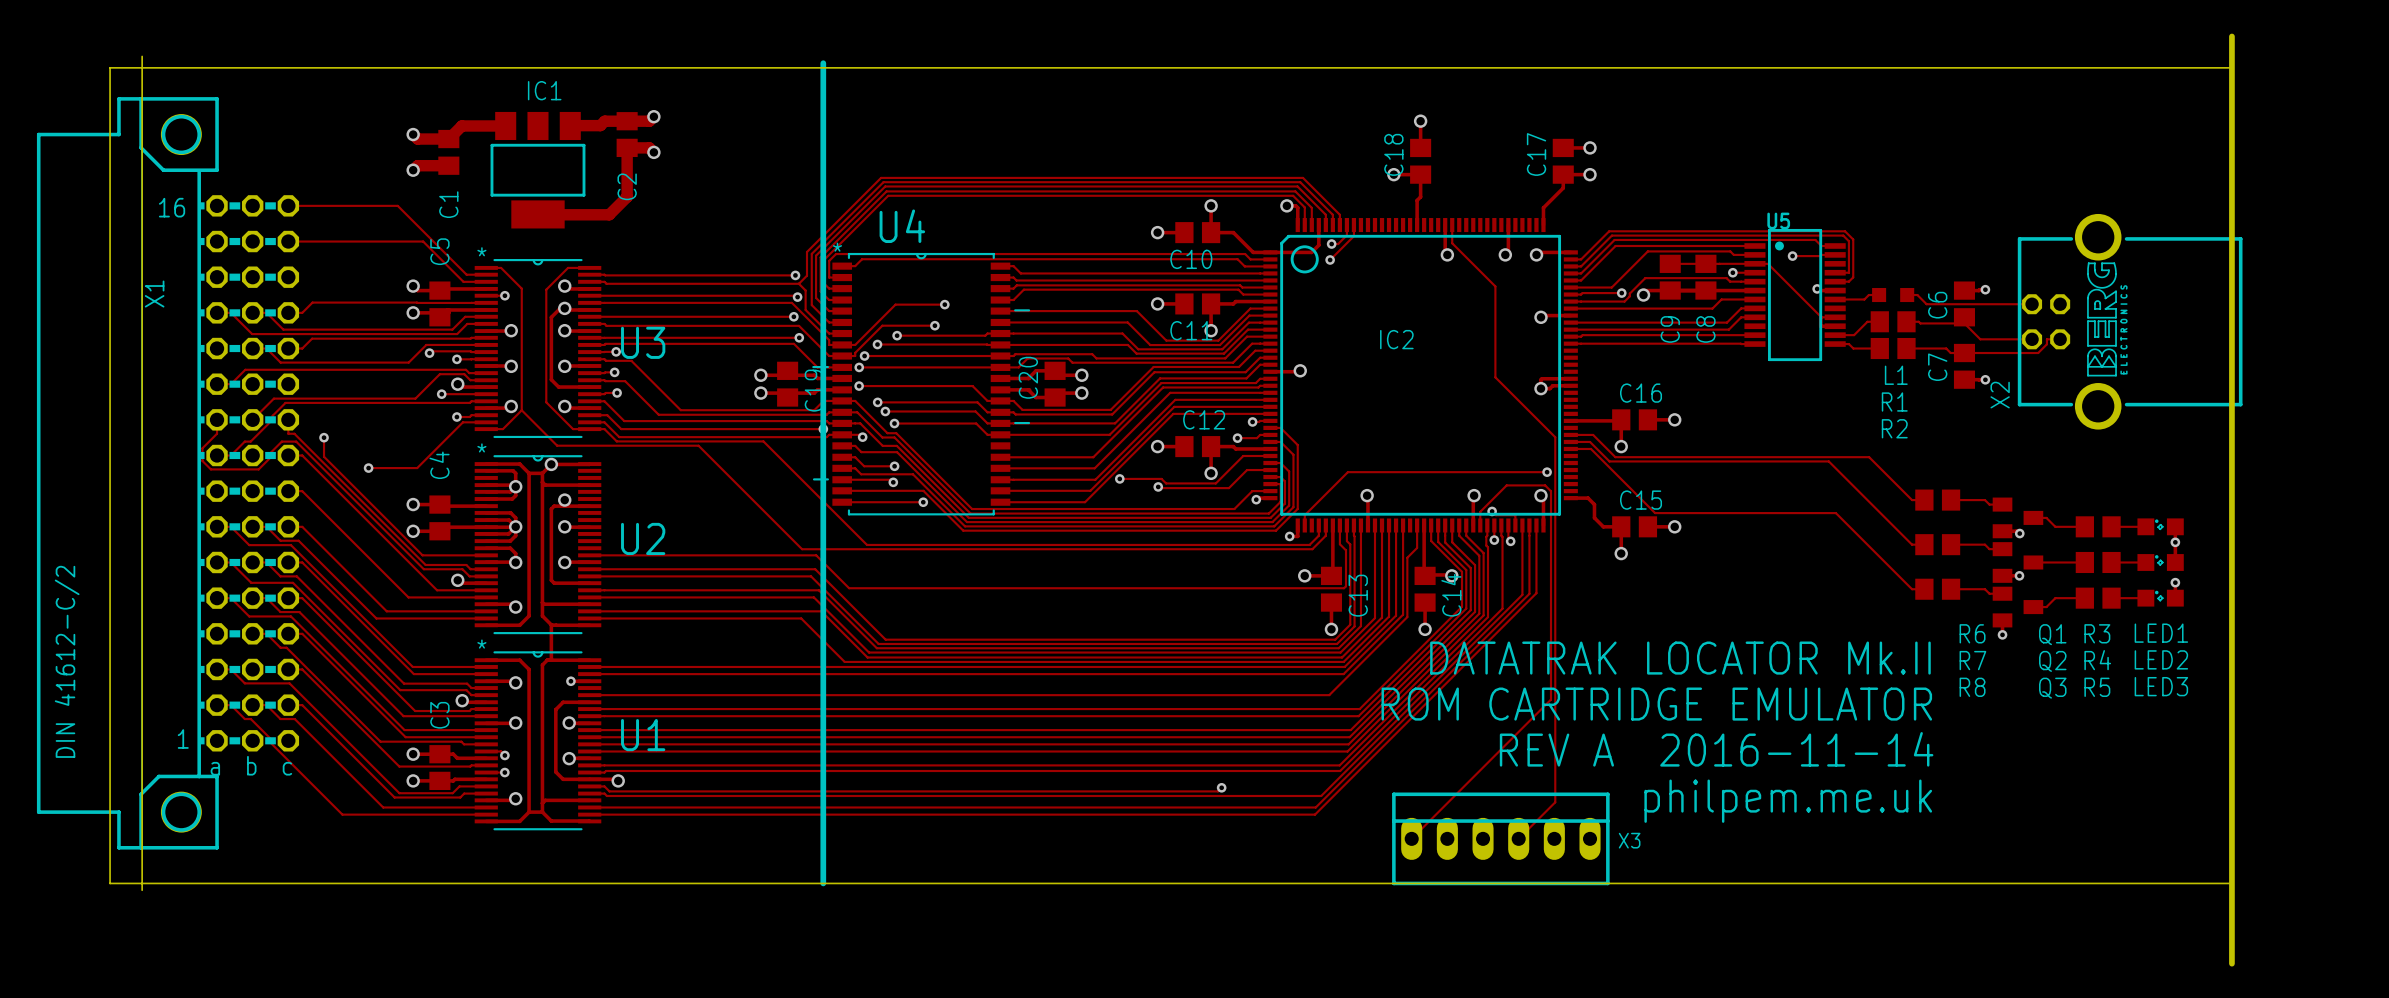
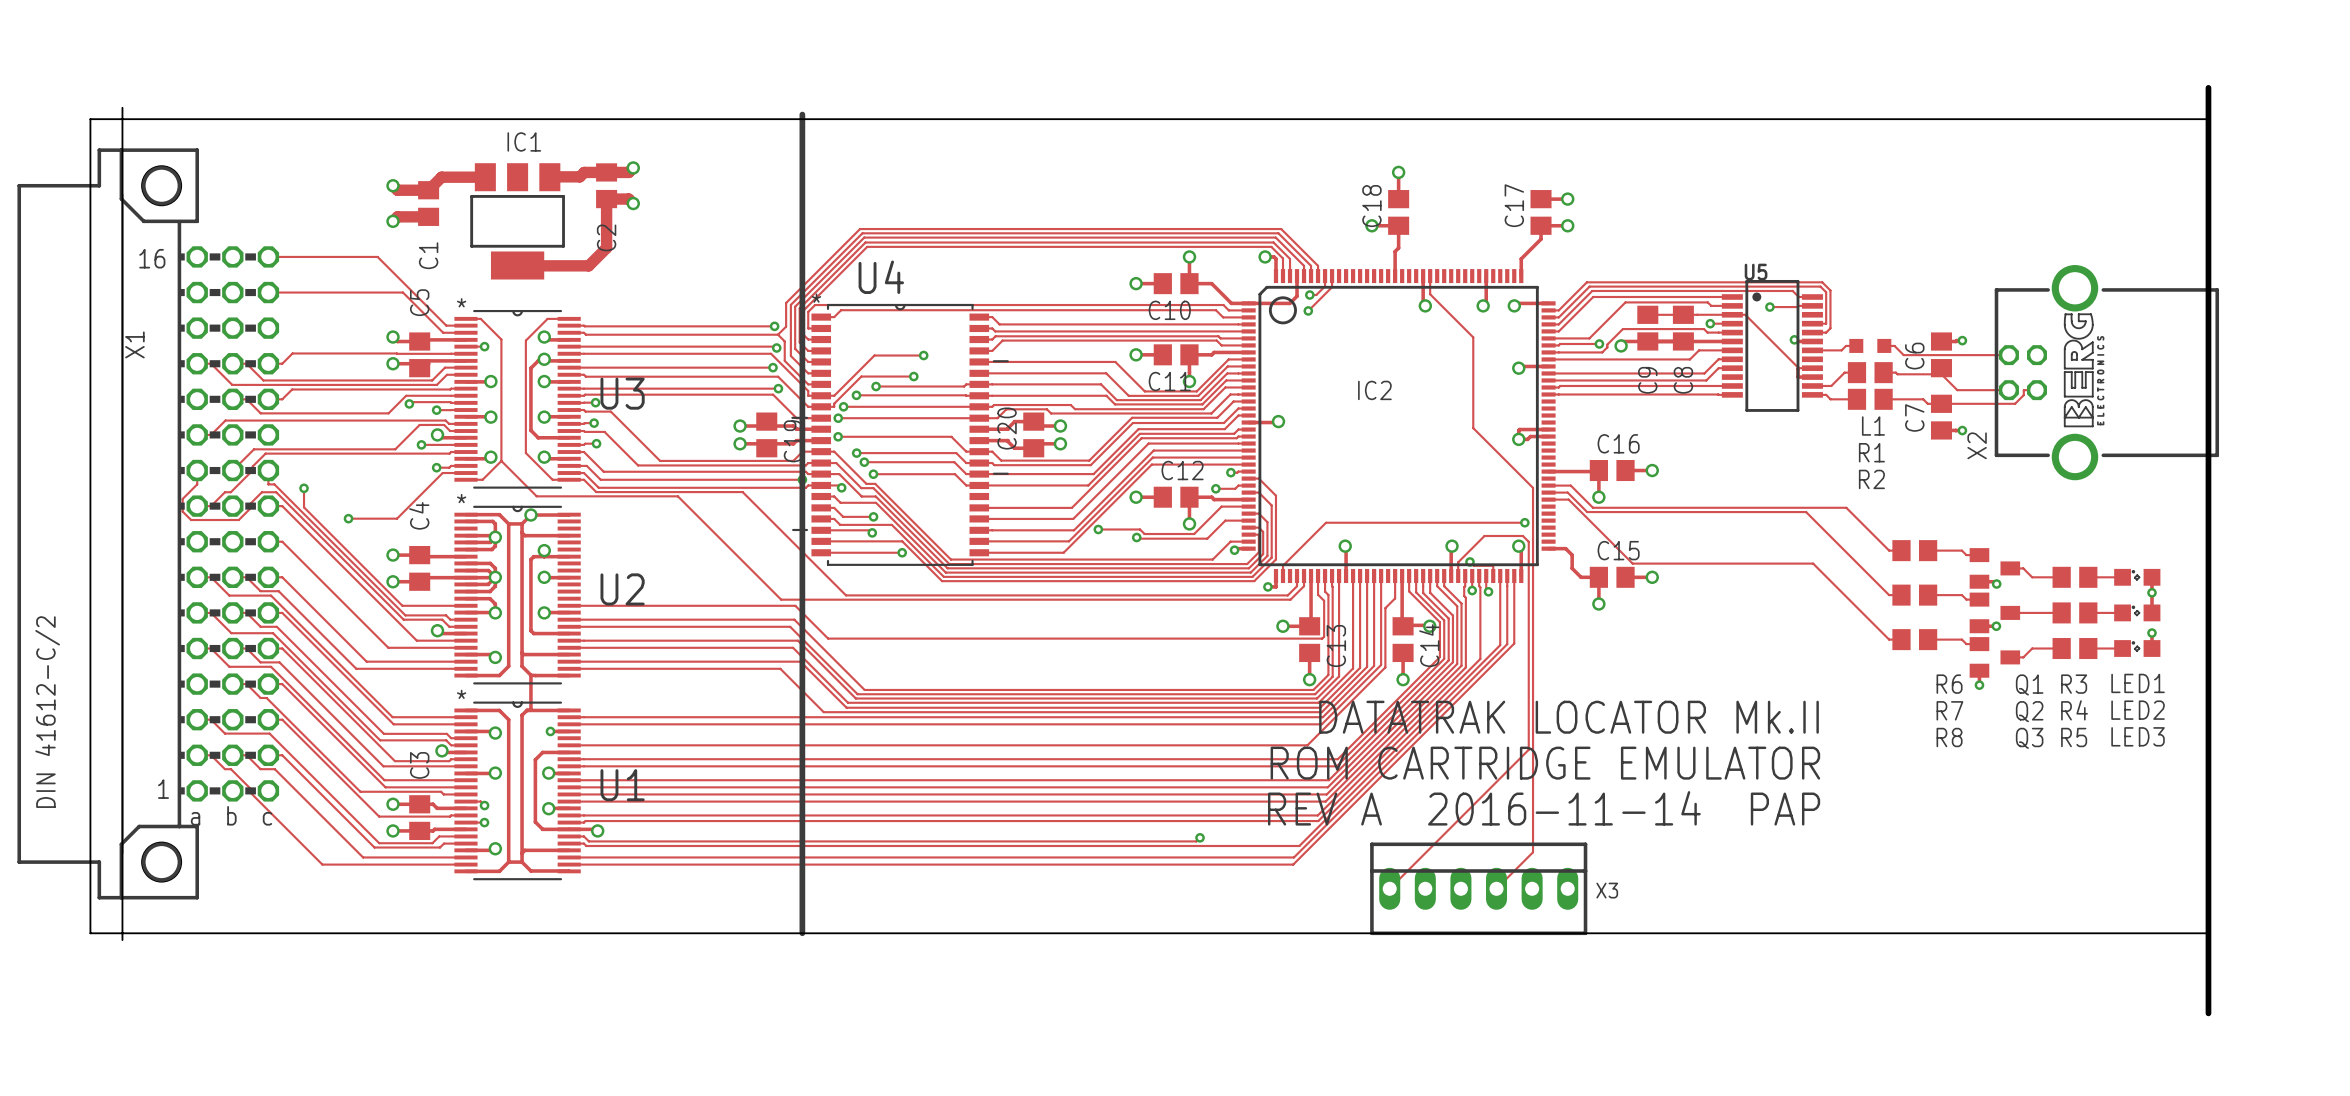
text position: DATATRAK LOCATOR Mk.II (1680, 658) -> DATATRAK LOCATOR Mk.II (1569, 717)
text position: ROM CARTRIDGE EMULATOR (1656, 704) -> ROM CARTRIDGE EMULATOR (1545, 763)
text: REV A 2016-11-14 (1716, 749) -> REV A 2016-11-14 PAP (1544, 808)
text: philpem.me.uk (1788, 801) -> none

